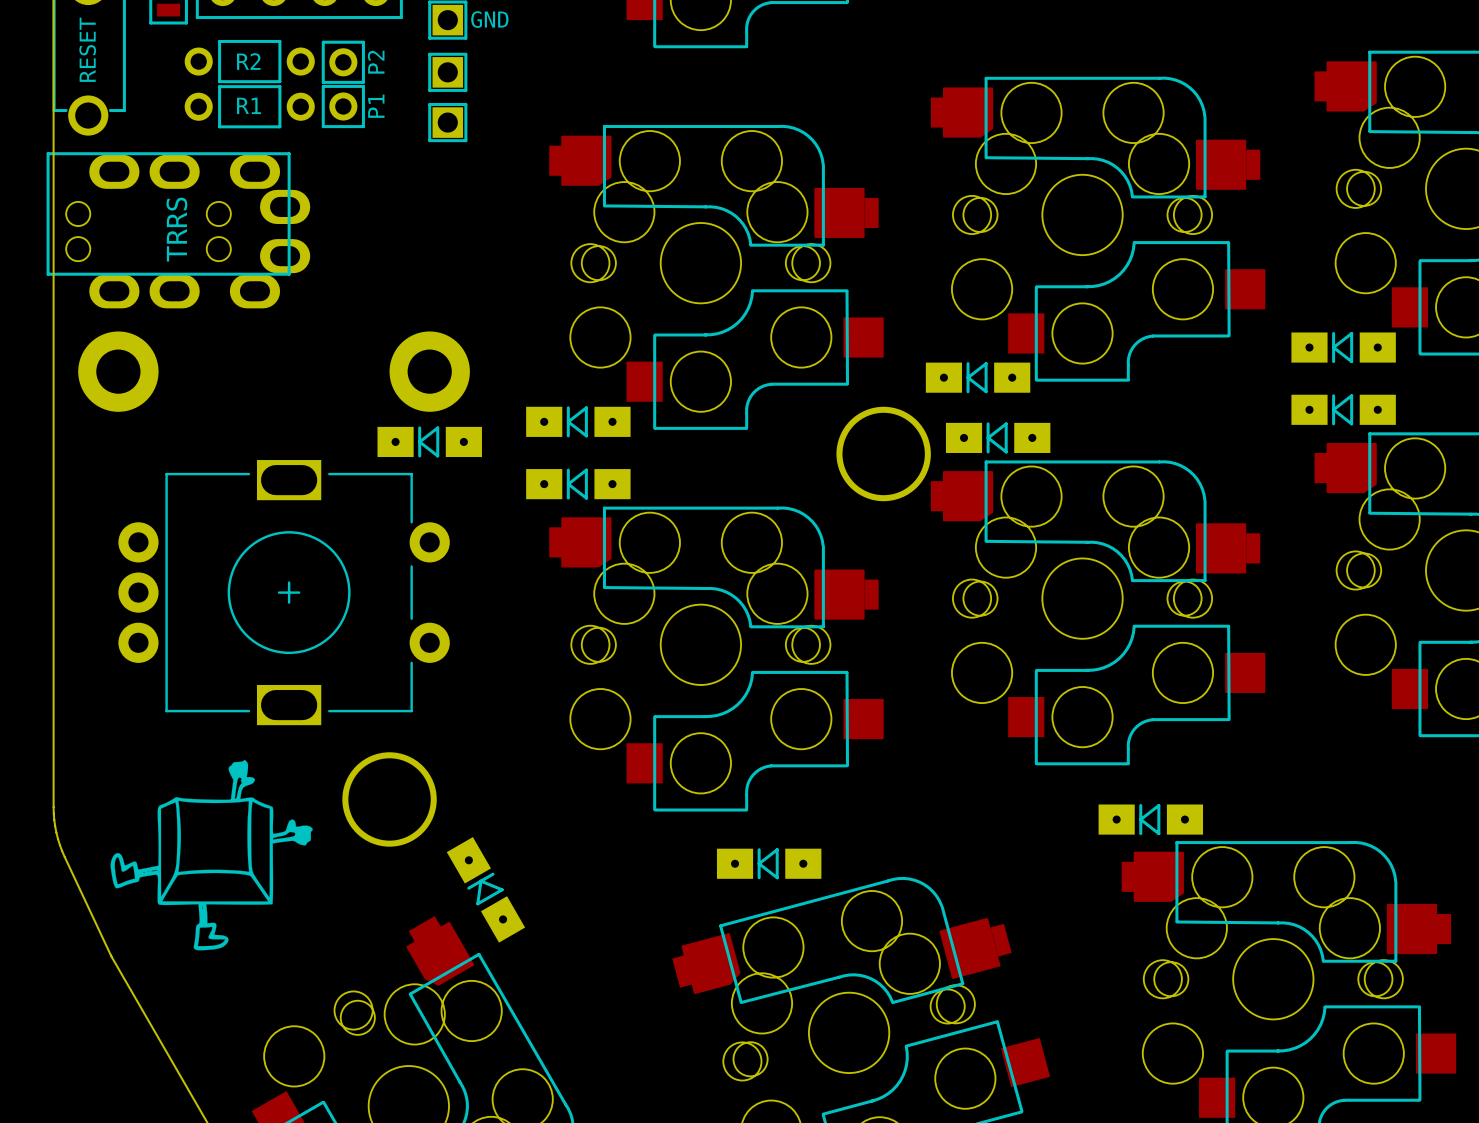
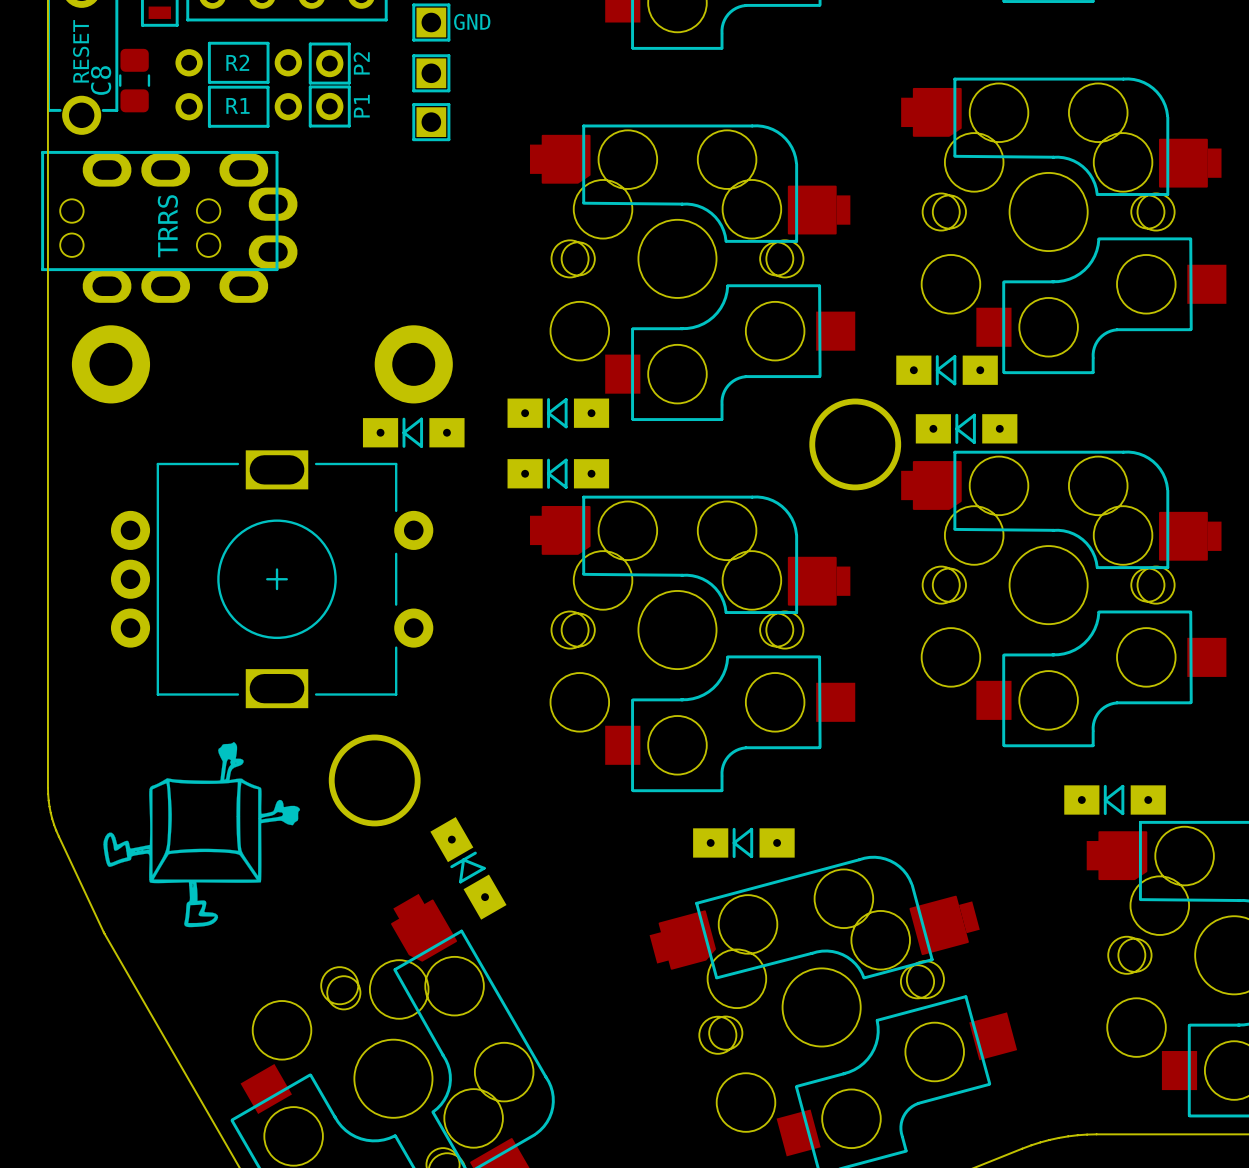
C8: none -> (134, 80)

